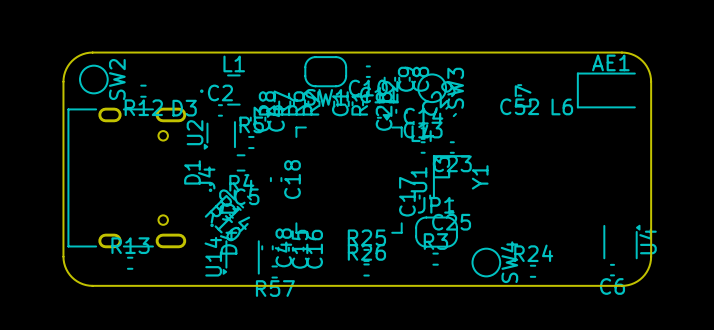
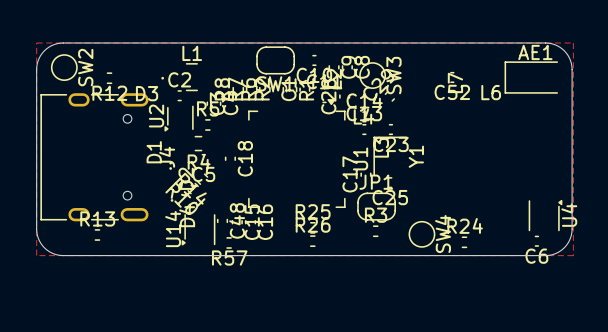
zone outline: none -> (36, 42) (573, 42) (573, 255) (36, 255) (36, 42)

